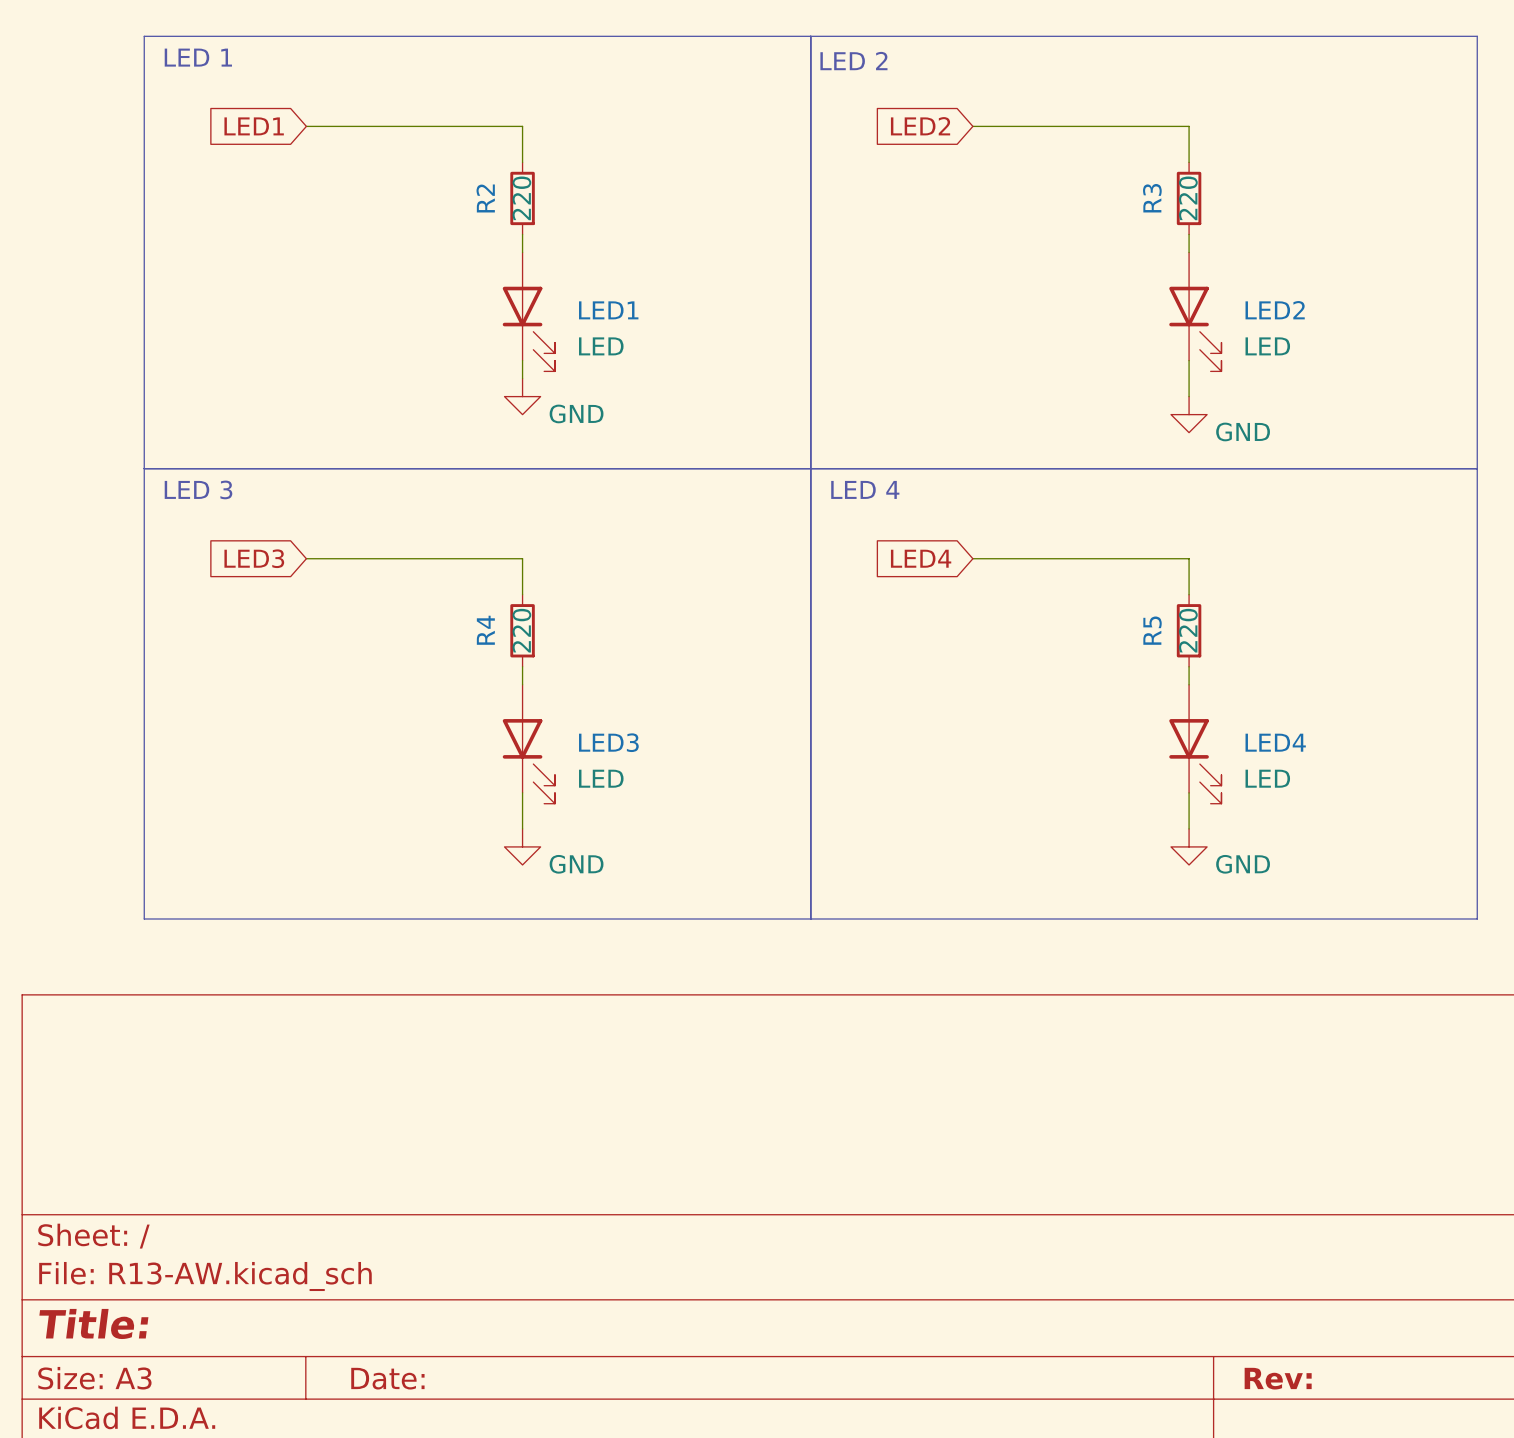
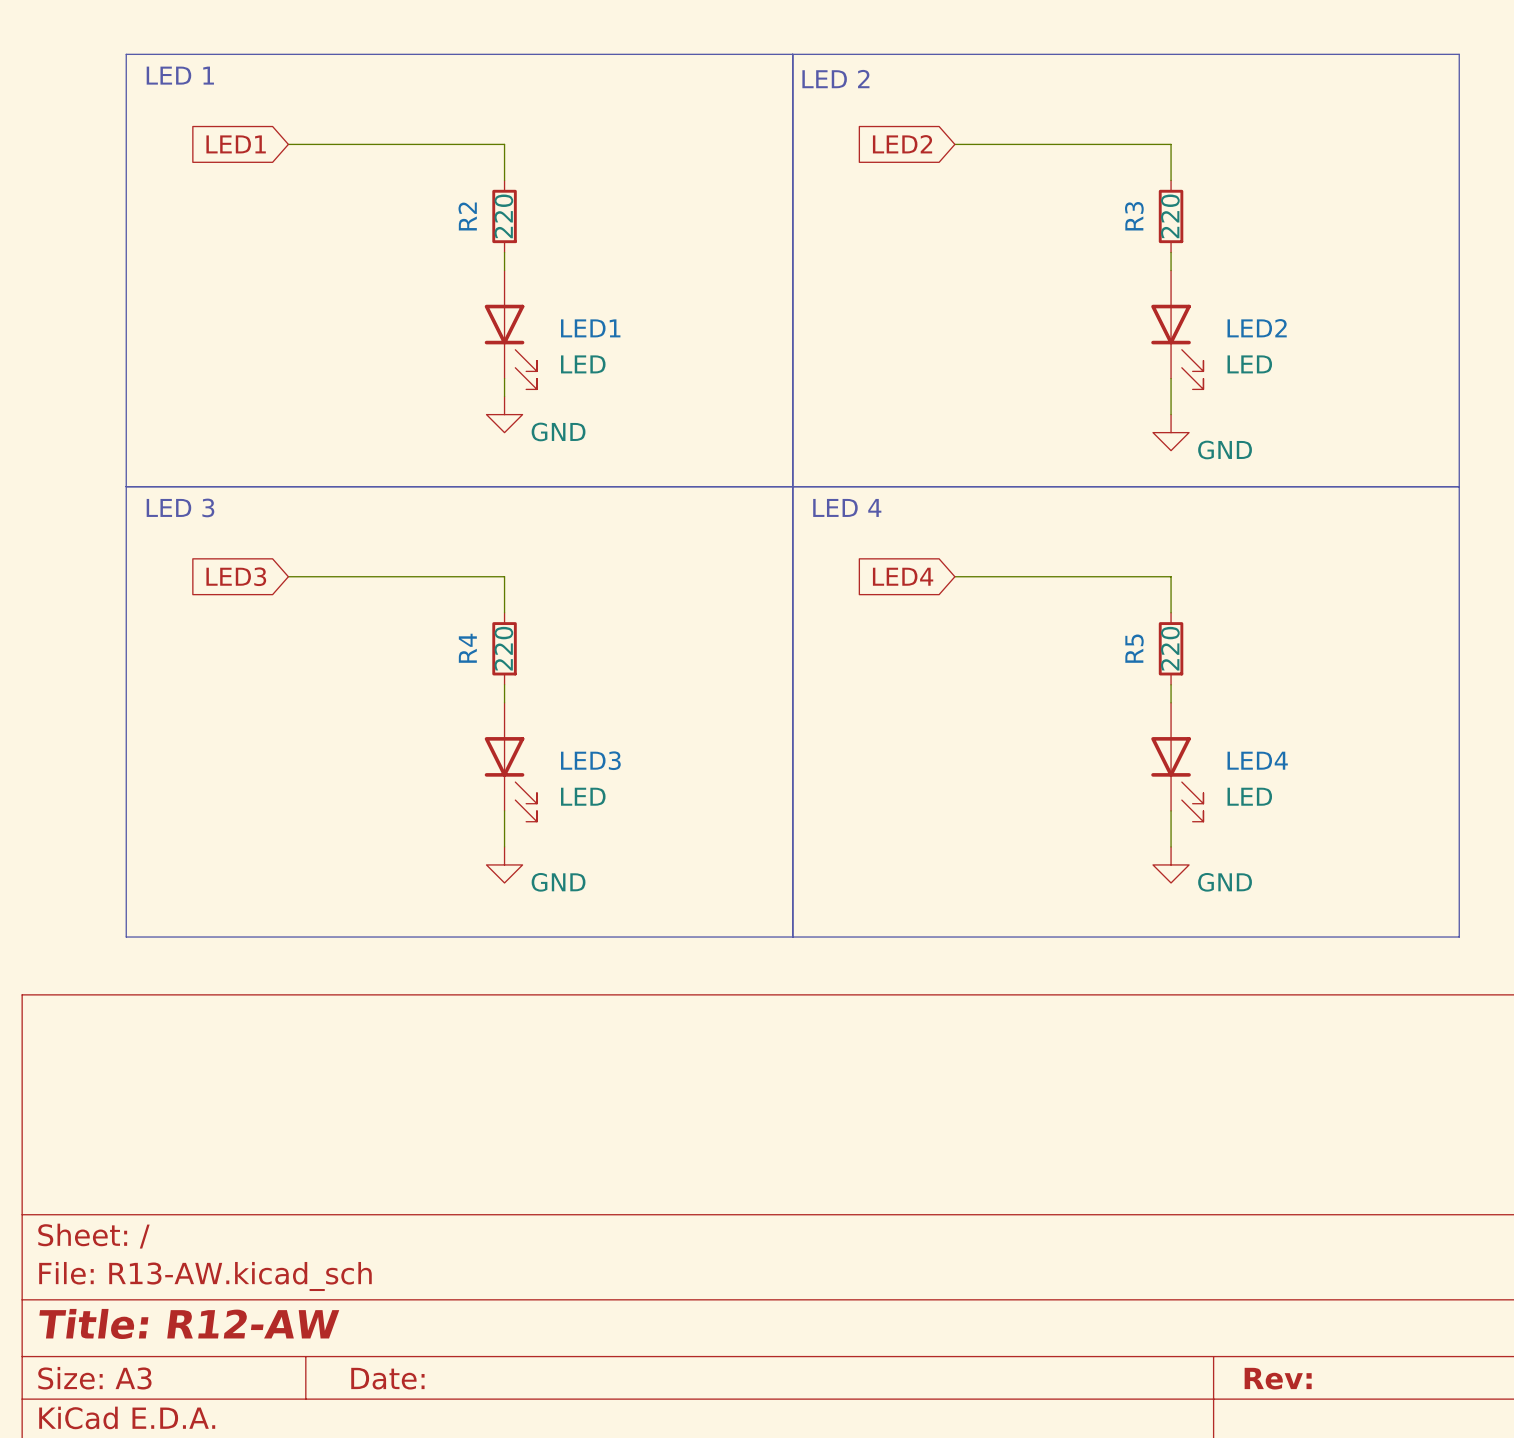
line: (144, 36) (1477, 36) (1477, 918) (144, 918) (144, 36) -> (126, 54) (1459, 54) (1459, 937) (126, 937) (126, 54)
line: (810, 36) (810, 918) -> (792, 54) (792, 937)
text position: LED 1 (198, 57) -> LED 1 (180, 75)
text position: LED 2 (853, 61) -> LED 2 (835, 79)
global label position: LED1 (254, 126) -> LED1 (236, 144)
wire: (306, 126) (522, 126) (522, 162) -> (288, 144) (504, 144) (504, 180)
global label position: LED2 (920, 126) -> LED2 (902, 144)
wire: (972, 126) (1189, 126) (1189, 162) -> (954, 144) (1171, 144) (1171, 180)
R2 position: (522, 198) -> (504, 216)
R3 position: (1189, 198) -> (1171, 216)
wire: (522, 234) (522, 252) -> (504, 252) (504, 270)
wire: (1189, 234) (1189, 252) -> (1171, 252) (1171, 270)
LED1 position: (528, 311) -> (510, 329)
LED2 position: (1195, 311) -> (1177, 329)
wire: (522, 360) (522, 378) -> (504, 378) (504, 396)
wire: (1189, 360) (1189, 396) -> (1171, 378) (1171, 414)
power symbol position: GND (522, 396) -> GND (504, 414)
power symbol position: GND (1189, 414) -> GND (1171, 432)
line: (144, 468) (1477, 468) -> (126, 486) (1459, 486)
text position: LED 3 (198, 489) -> LED 3 (180, 507)
text position: LED 4 (865, 489) -> LED 4 (847, 507)
global label position: LED3 (254, 558) -> LED3 (236, 576)
wire: (306, 558) (522, 558) (522, 594) -> (288, 576) (504, 576) (504, 612)
global label position: LED4 (921, 558) -> LED4 (903, 576)
wire: (972, 558) (1189, 558) (1189, 594) -> (954, 576) (1171, 576) (1171, 612)
R4 position: (522, 630) -> (504, 648)
R5 position: (1189, 630) -> (1171, 648)
wire: (522, 666) (522, 684) -> (504, 684) (504, 702)
wire: (1189, 666) (1189, 684) -> (1171, 684) (1171, 702)
LED3 position: (528, 744) -> (510, 762)
LED4 position: (1195, 744) -> (1177, 762)
wire: (522, 792) (522, 828) -> (504, 810) (504, 846)
wire: (1189, 792) (1189, 828) -> (1171, 810) (1171, 846)
power symbol position: GND (522, 846) -> GND (504, 864)
power symbol position: GND (1189, 846) -> GND (1171, 864)
title block: Title: (93, 1323) -> Title: R12-AW (189, 1323)

